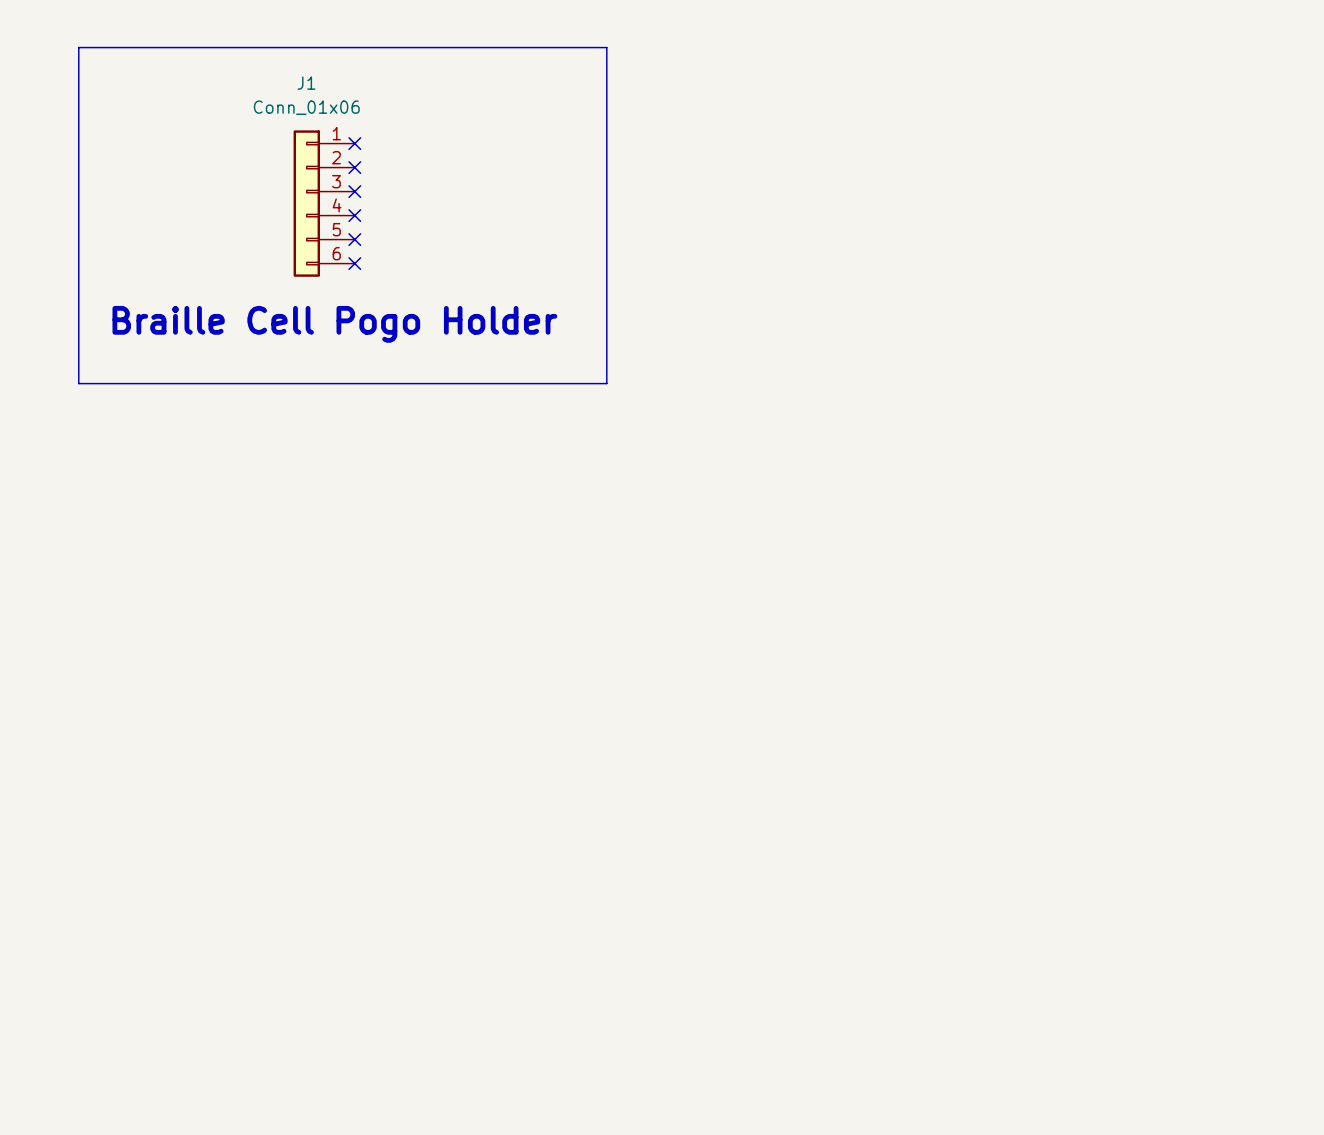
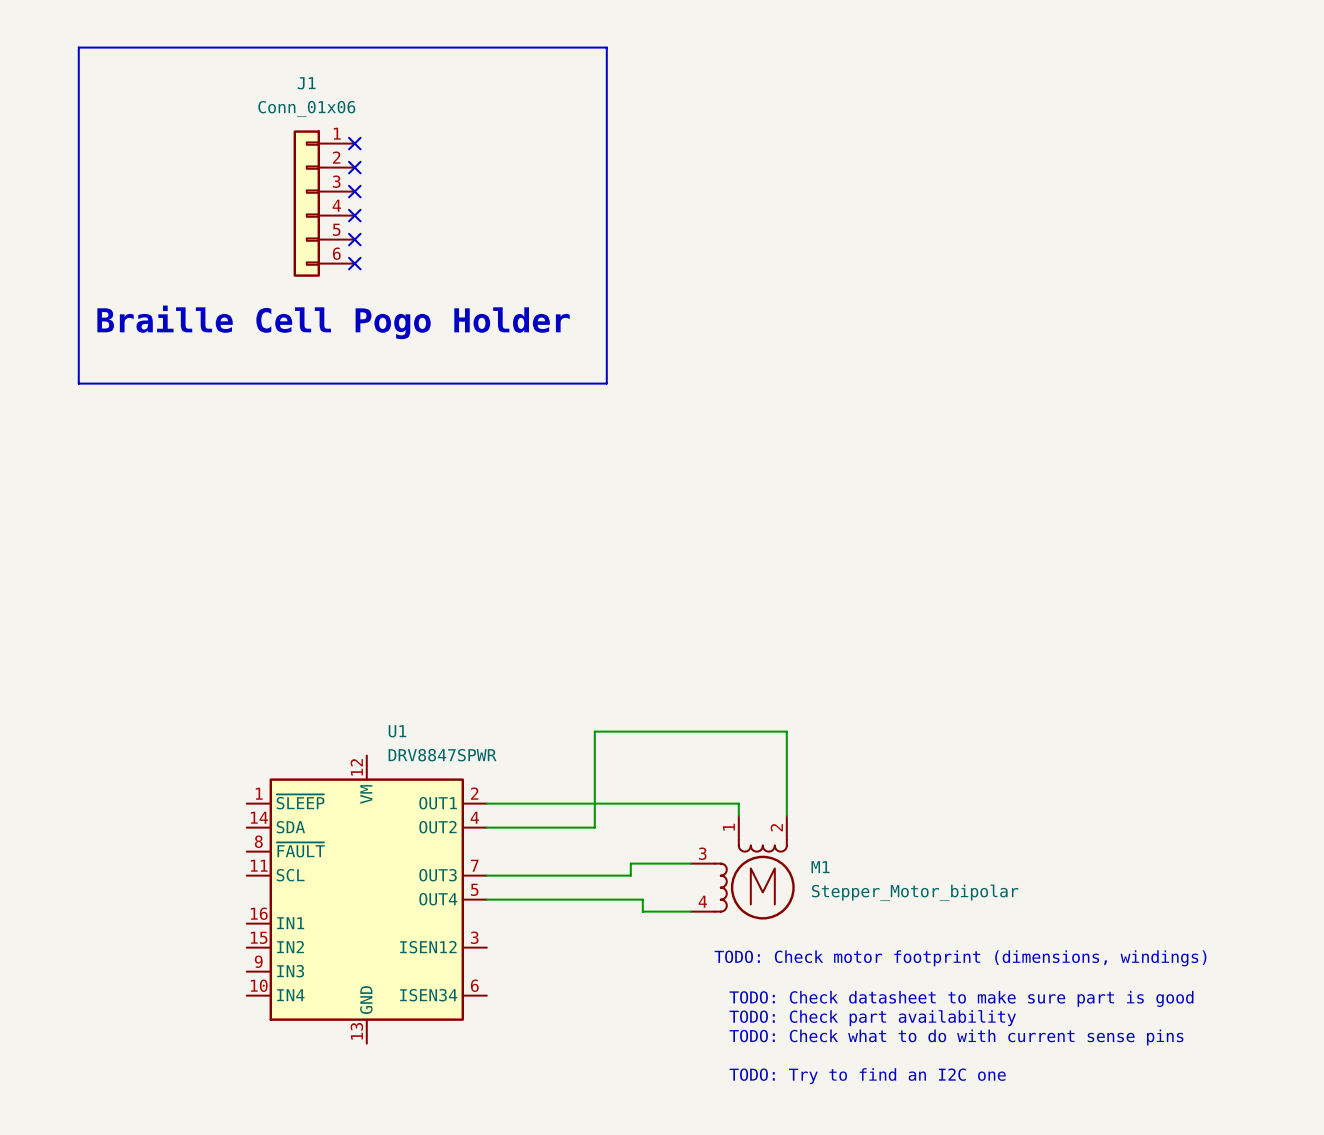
wire: none -> (486, 803) (738, 803) (738, 815)
wire: none -> (786, 815) (786, 731) (594, 731) (594, 827) (486, 827)
wire: none -> (690, 863) (630, 863) (630, 875) (486, 875)
M1: none -> Stepper_Motor_bipolar (742, 867)
U1: none -> DRV8847SPWR (366, 899)
wire: none -> (486, 899) (642, 899) (642, 911) (690, 911)
text: none -> TODO: Check motor footprint (dimensions, windings) (960, 958)
text: none -> TODO: Check datasheet to make sure part is good (961, 998)
text: none -> TODO: Check part availability (872, 1018)
text: none -> TODO: Check what to do with current sense pins (956, 1037)
text: none -> TODO: Try to find an I2C one (867, 1076)

